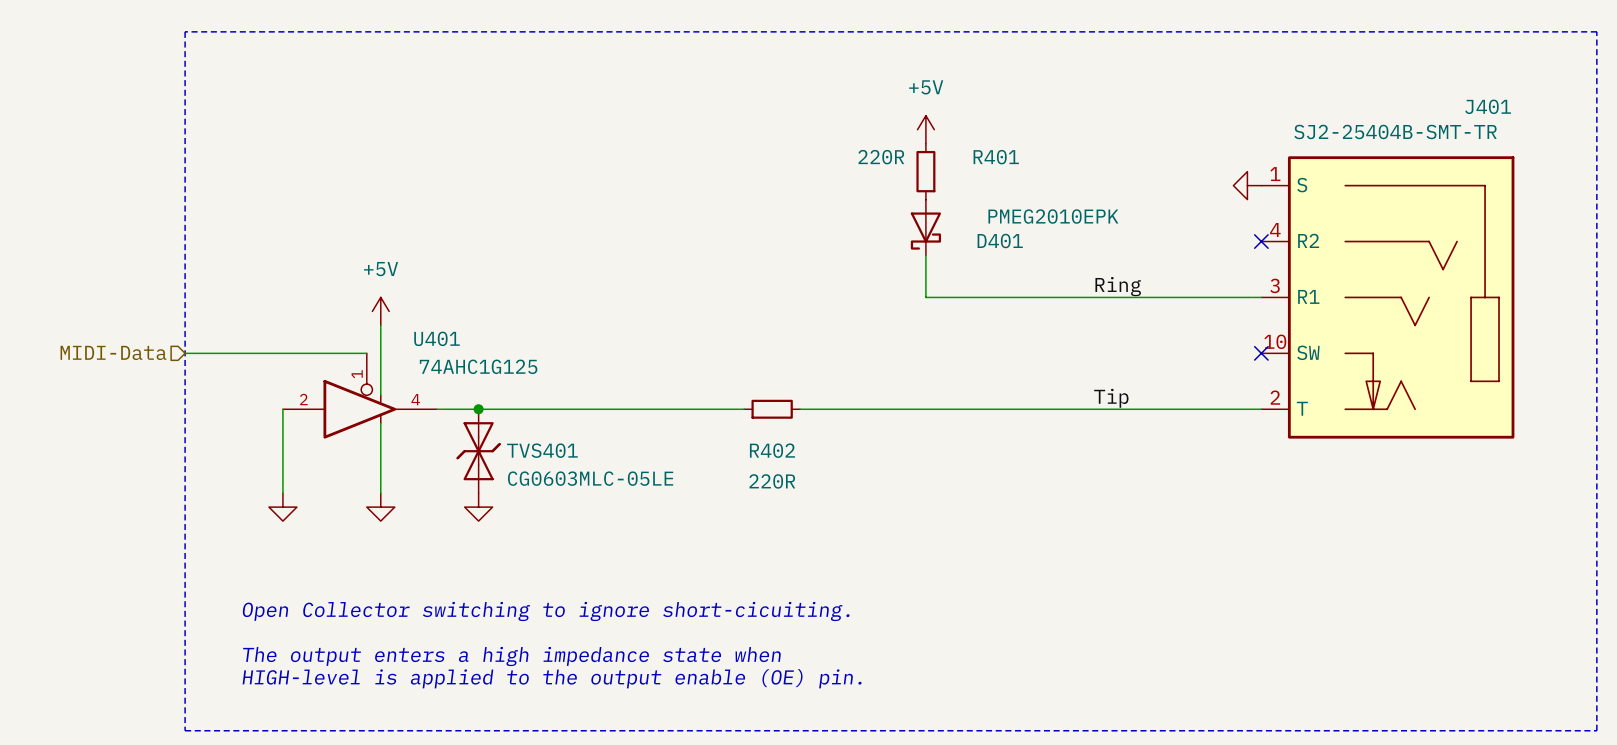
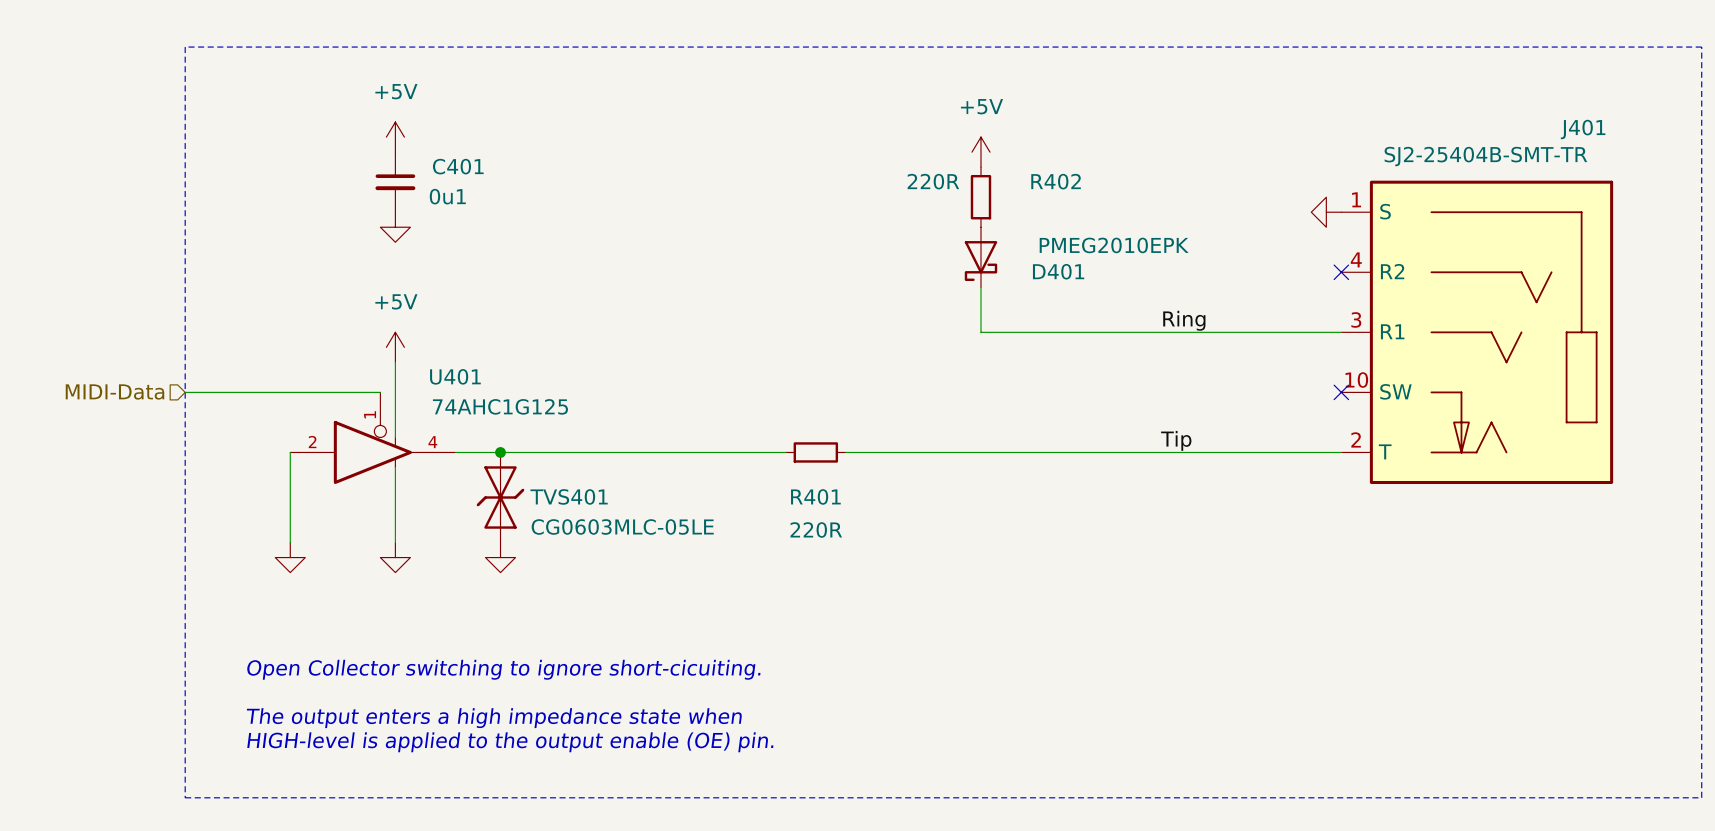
power symbol: none -> +5V (395, 137)
C401: none -> 0u1 (395, 182)
R401 name: R401 (996, 157) -> R402 (1056, 181)
power symbol: none -> (395, 227)
R402 name: R402 (772, 450) -> R401 (815, 496)

